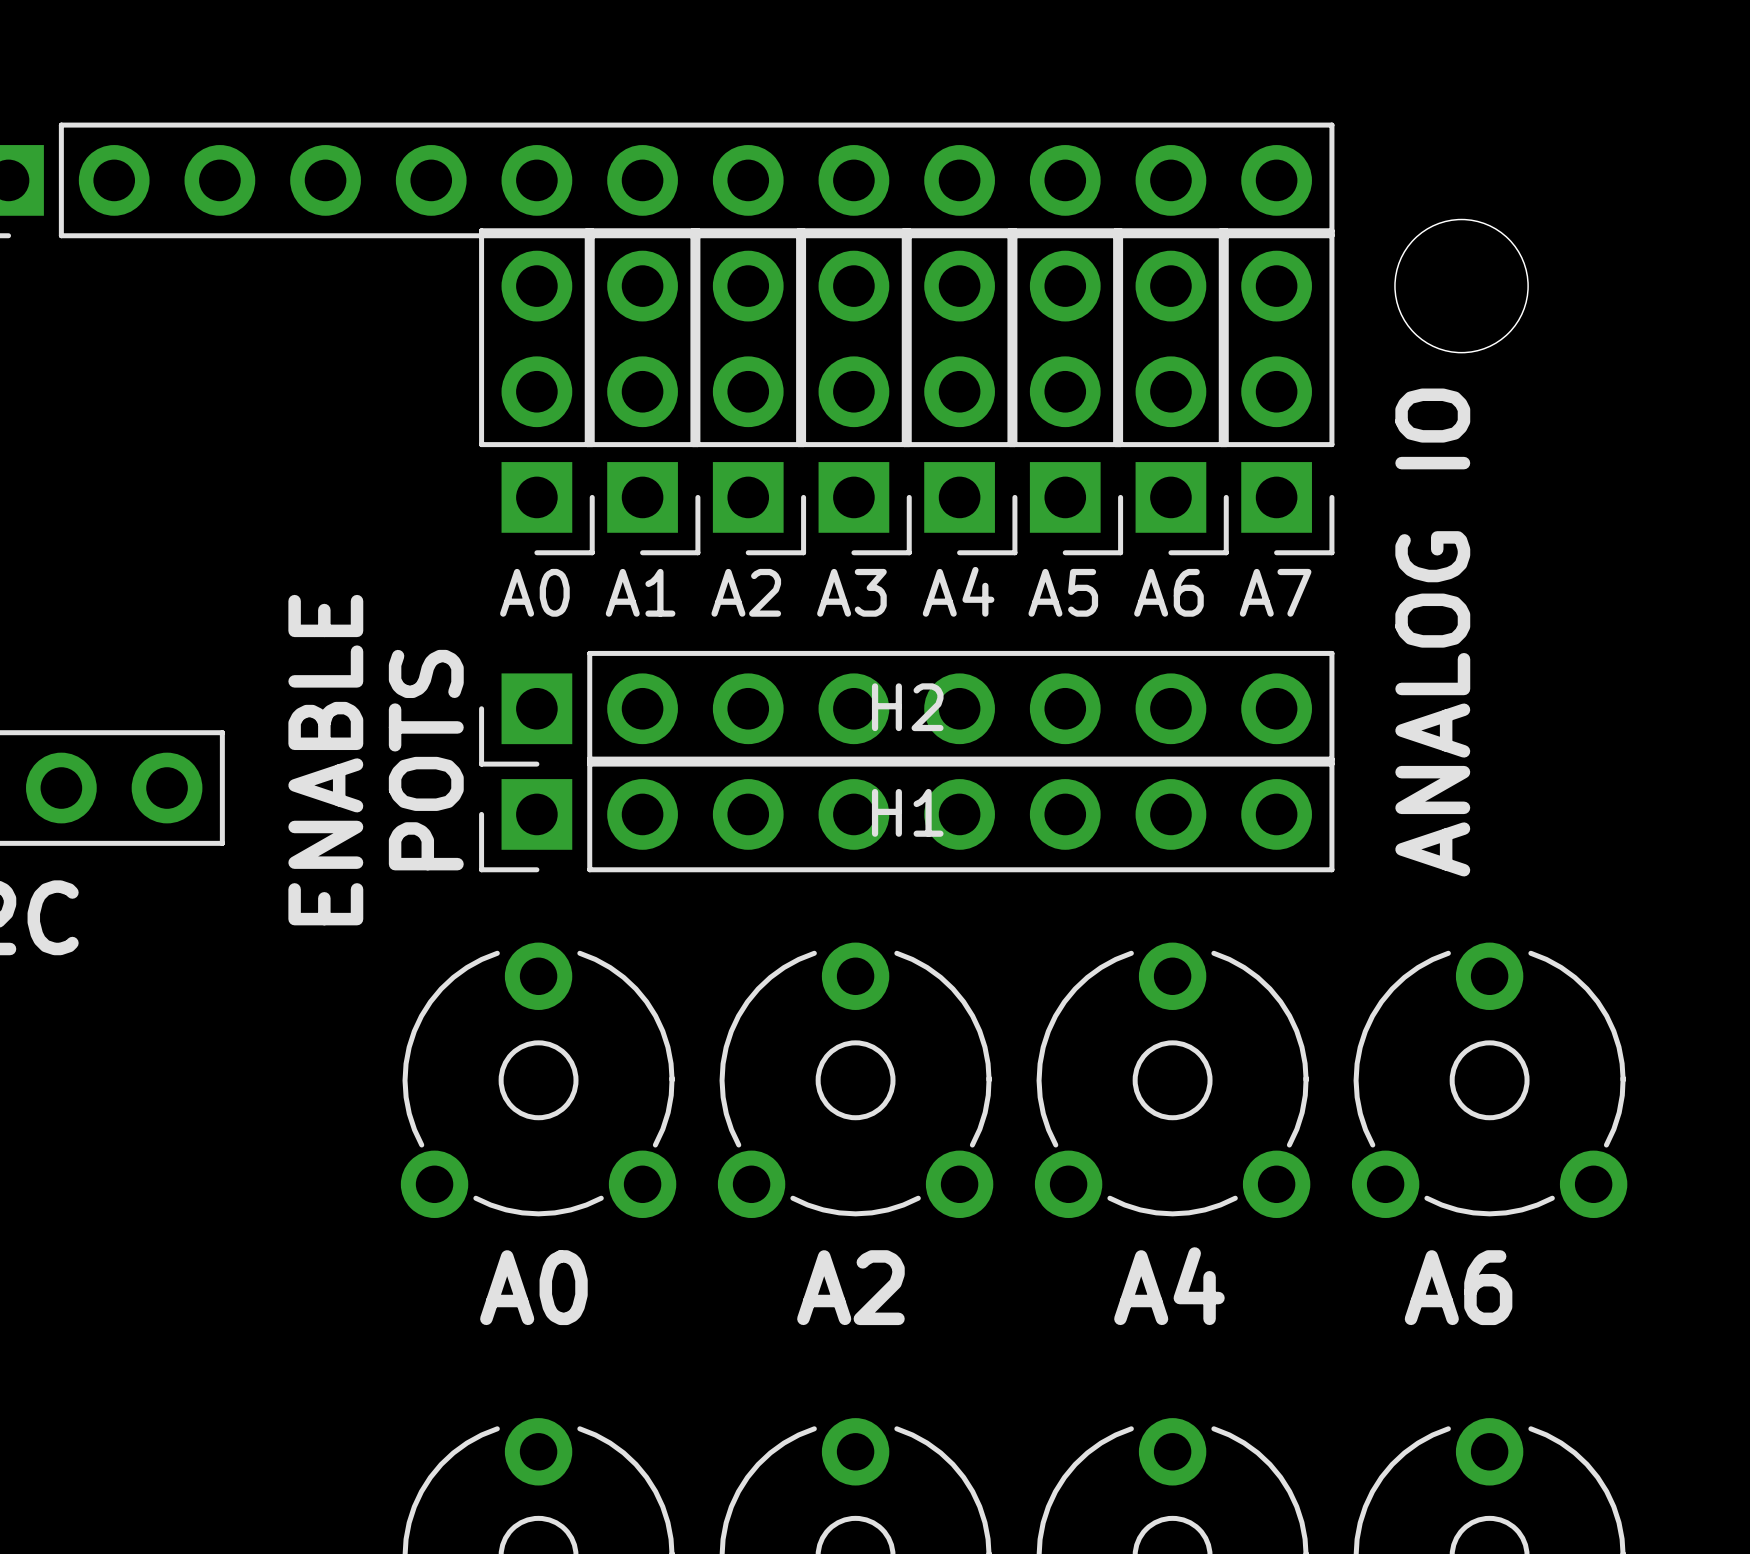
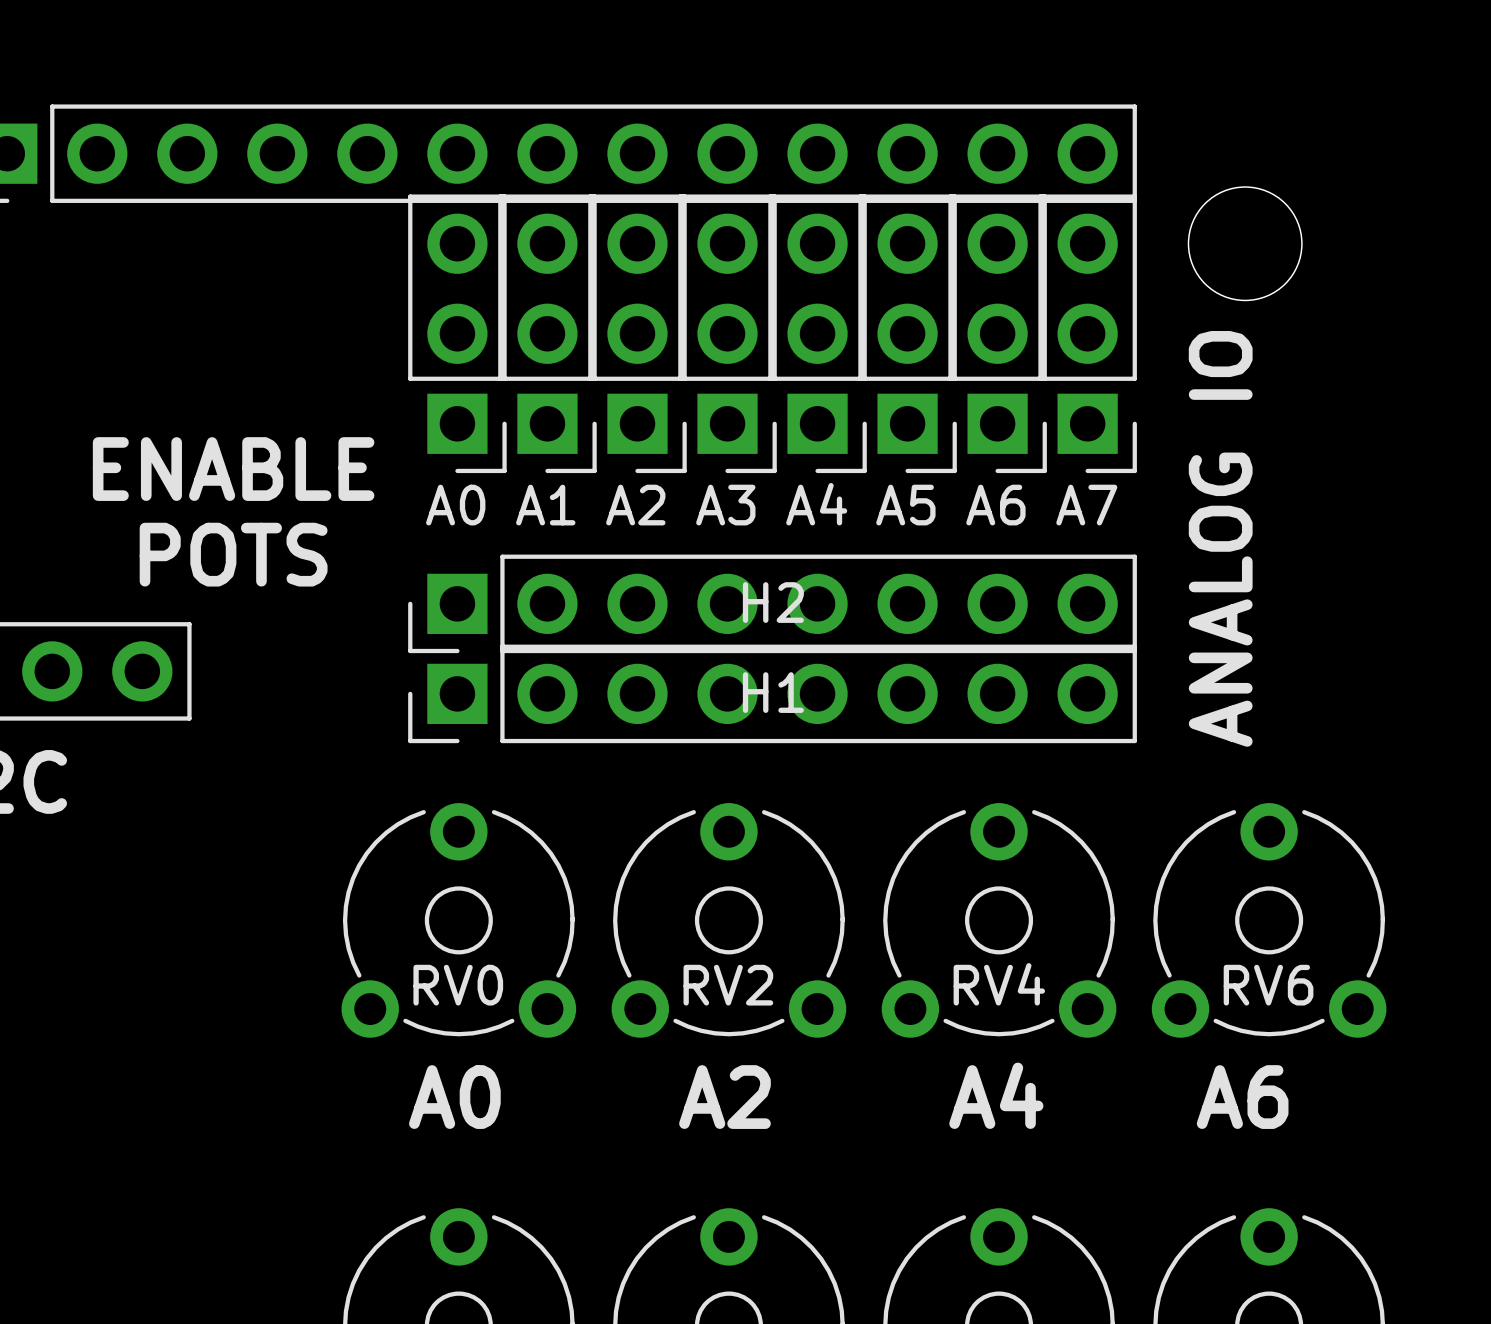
text rotation: 0° (325, 760) -> 90° clockwise (233, 469)
text rotation: 0° (426, 760) -> 90° clockwise (233, 554)
RV4 name: none -> RV4 (999, 984)
RV0 name: none -> RV0 (458, 985)
RV2 name: none -> RV2 (728, 985)
RV6 name: none -> RV6 (1268, 985)

